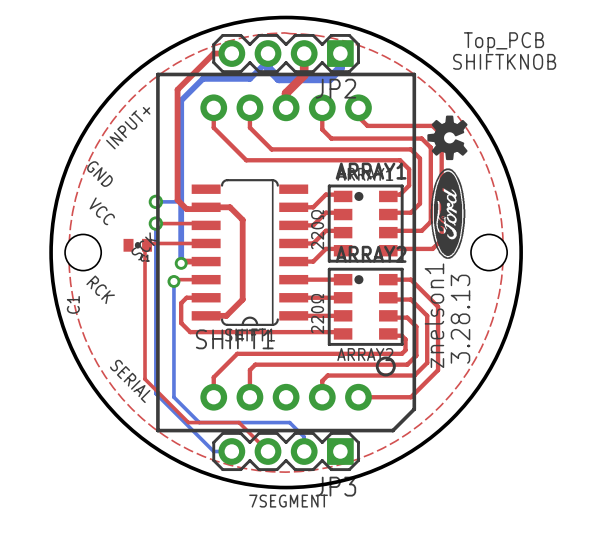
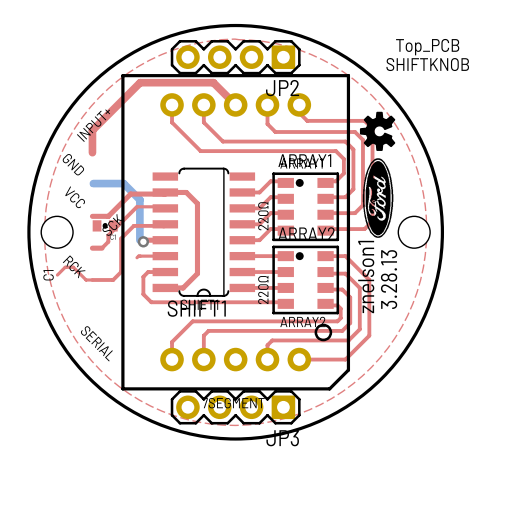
top track: (231, 53) (213, 53) (177, 89) (177, 200) (186, 209) -> (92, 216) (108, 216) (130, 194) (148, 194)
bottom track: (268, 53) (268, 68) (278, 78) (329, 78) (340, 68) (340, 53) -> none
top track: (304, 53) (304, 75) (286, 93) (286, 107) -> (92, 152) (92, 130) (140, 82) (213, 82) (235, 104)
bottom track: (268, 60) (249, 78) (202, 78) (181, 100) (181, 263) -> none
bottom track: none -> (92, 184) (123, 183) (139, 199) (139, 240)
bottom track: (155, 201) (181, 201) -> none
via: (155, 201) -> none
bottom track: (155, 223) (155, 393) (213, 451) (231, 451) -> none
top track: (155, 223) (173, 223) -> (92, 248) (102, 248) (108, 241) (108, 235) (137, 206)
via: (155, 223) -> none
top track: (206, 243) (148, 243) (145, 247) (145, 379) (188, 422) (239, 422) (268, 451) -> (165, 224) (163, 225) (133, 225) (121, 238) (121, 272) (113, 279) (86, 279) (73, 267) (65, 267) (57, 275)
bottom track: (173, 281) (173, 397) (199, 422) (289, 422) (304, 437) (304, 451) -> none
via: (173, 281) -> none
text position: 7SEGMENT (288, 501) -> 7SEGMENT (233, 403)

